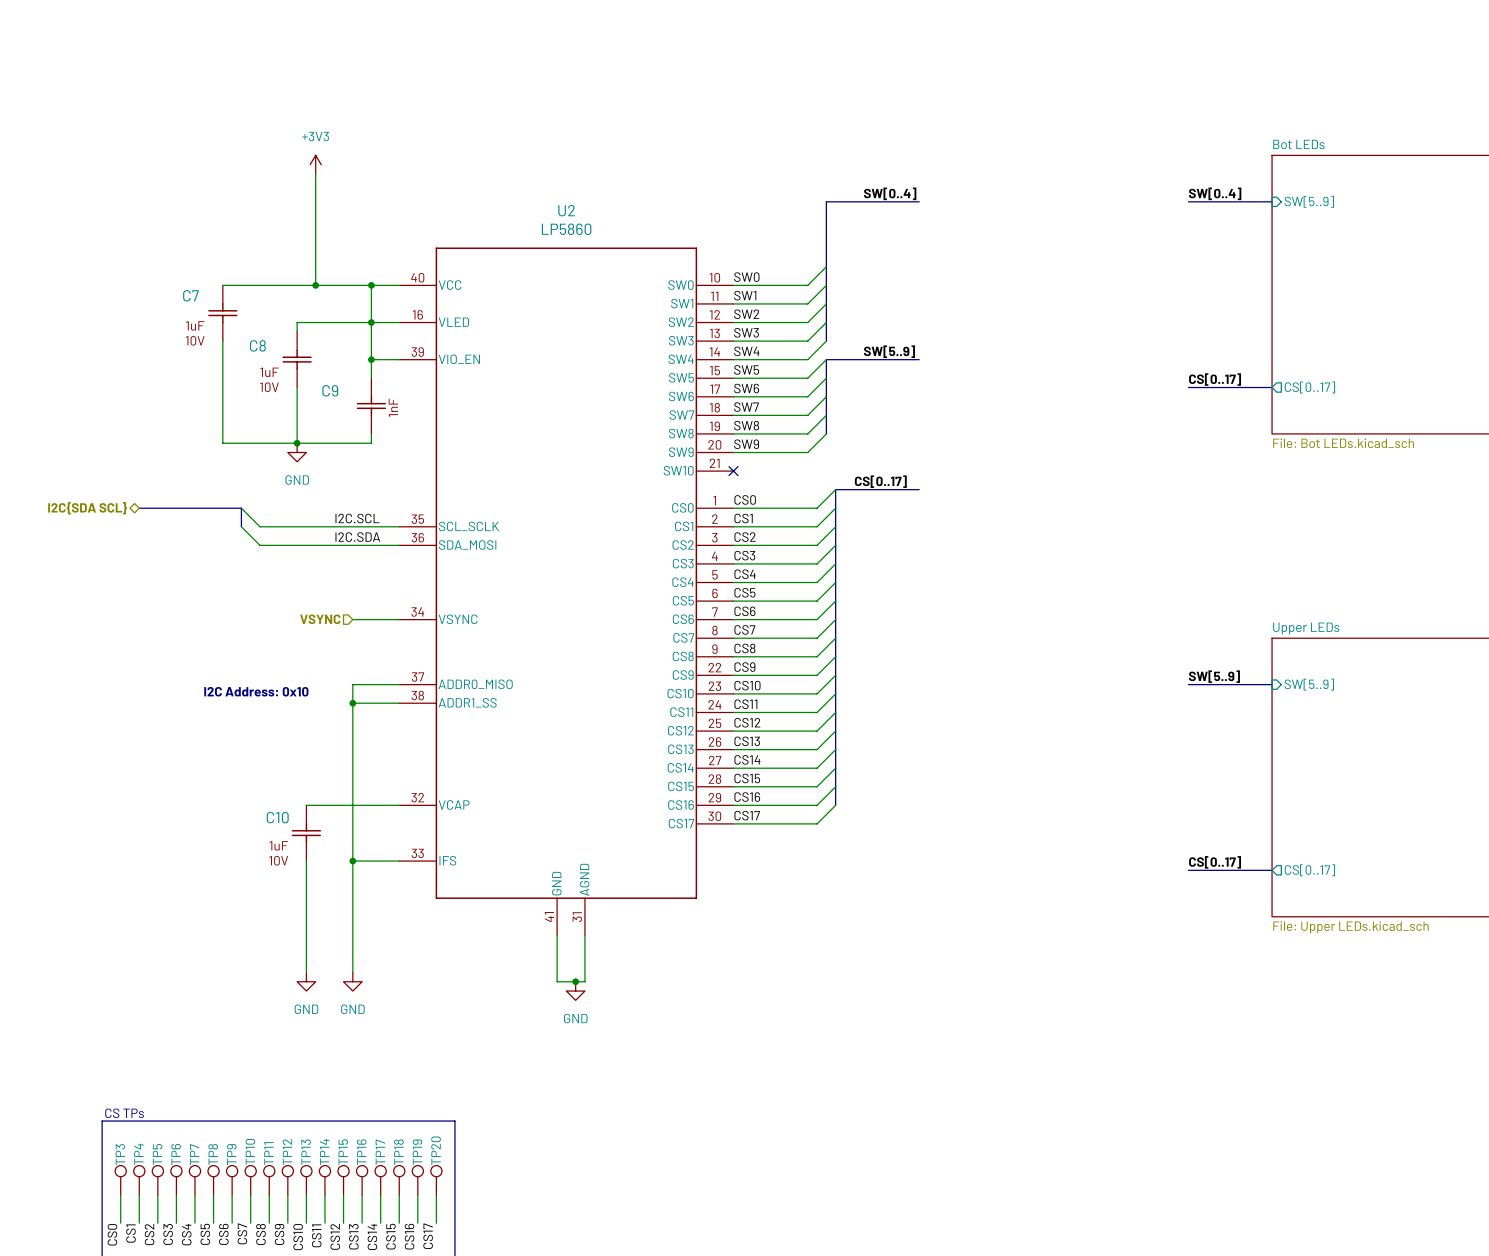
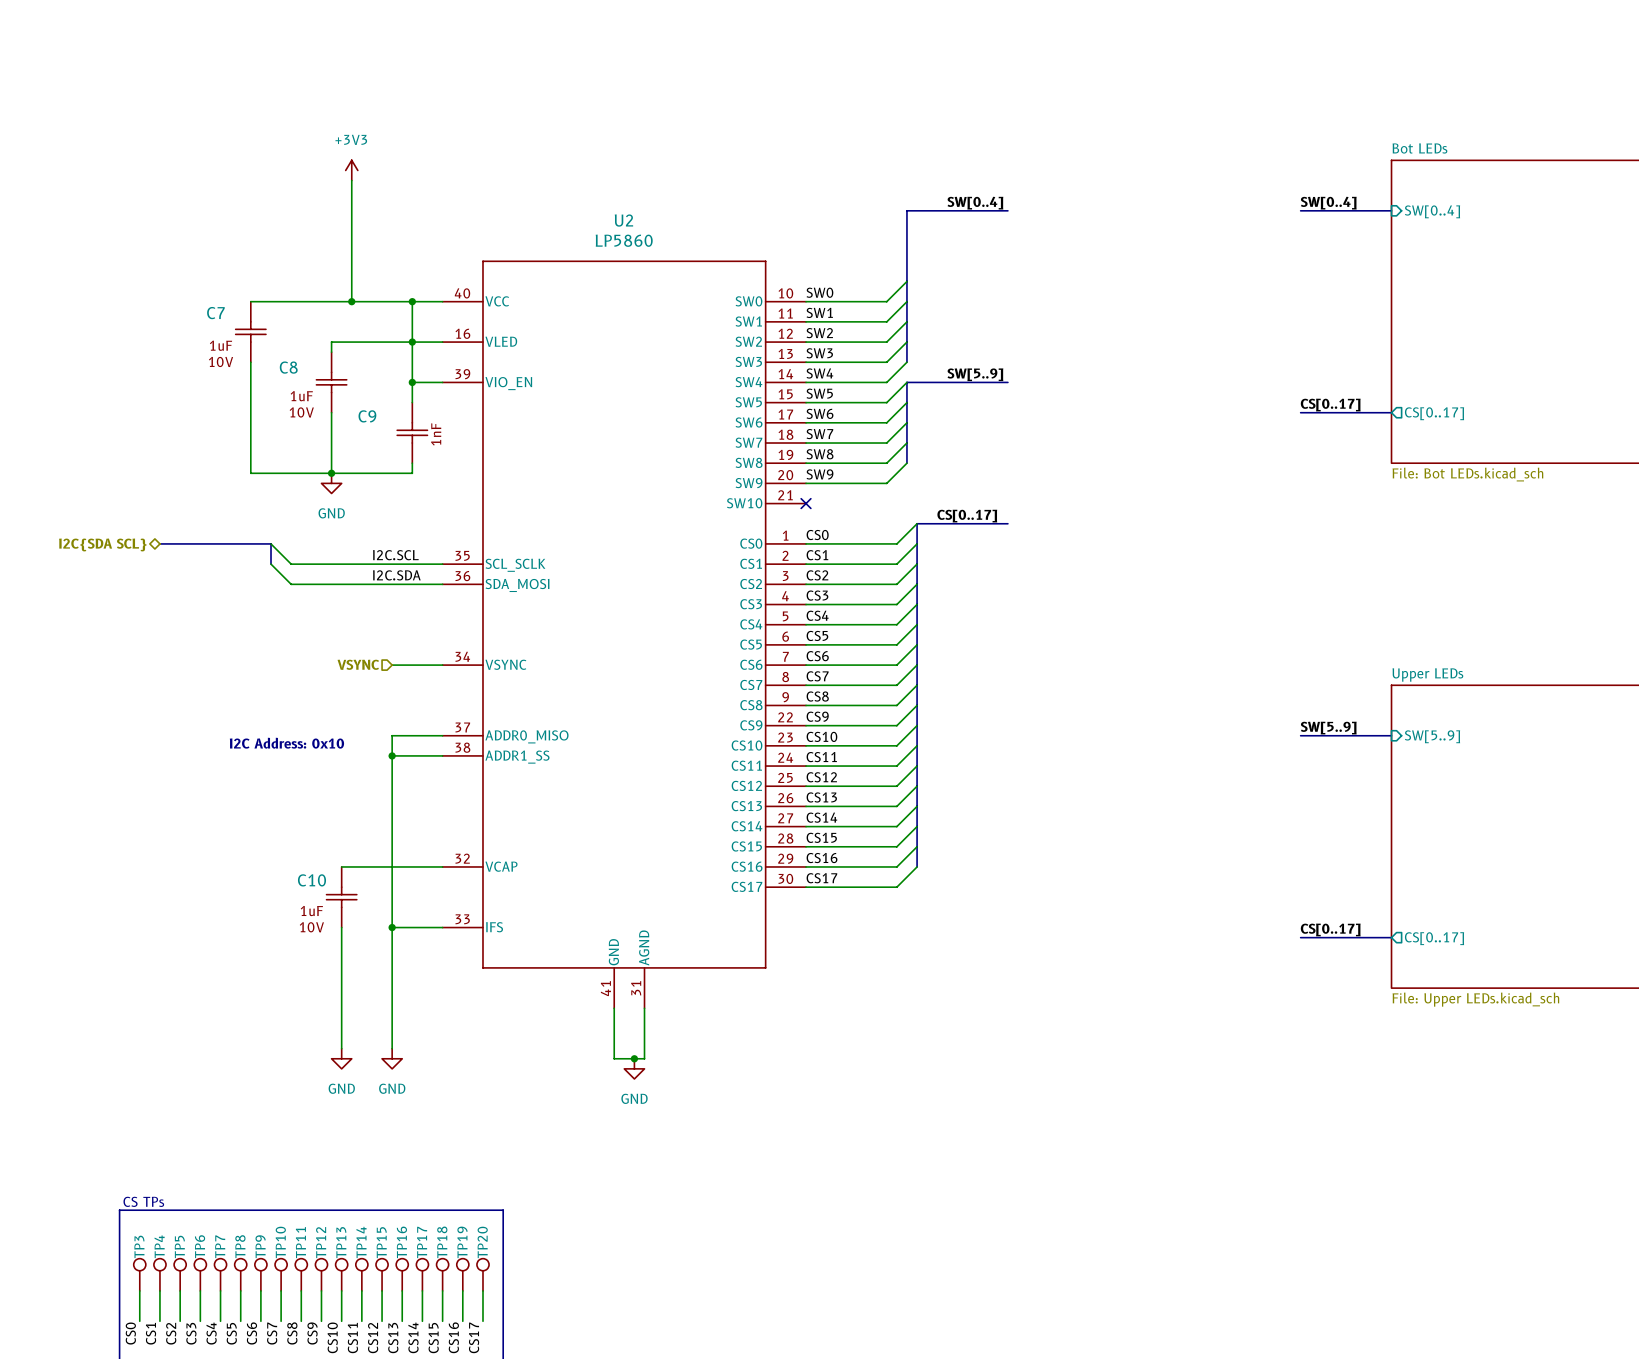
sheet pin: SW[5..9] (1309, 201) -> SW[0..4] (1432, 211)

